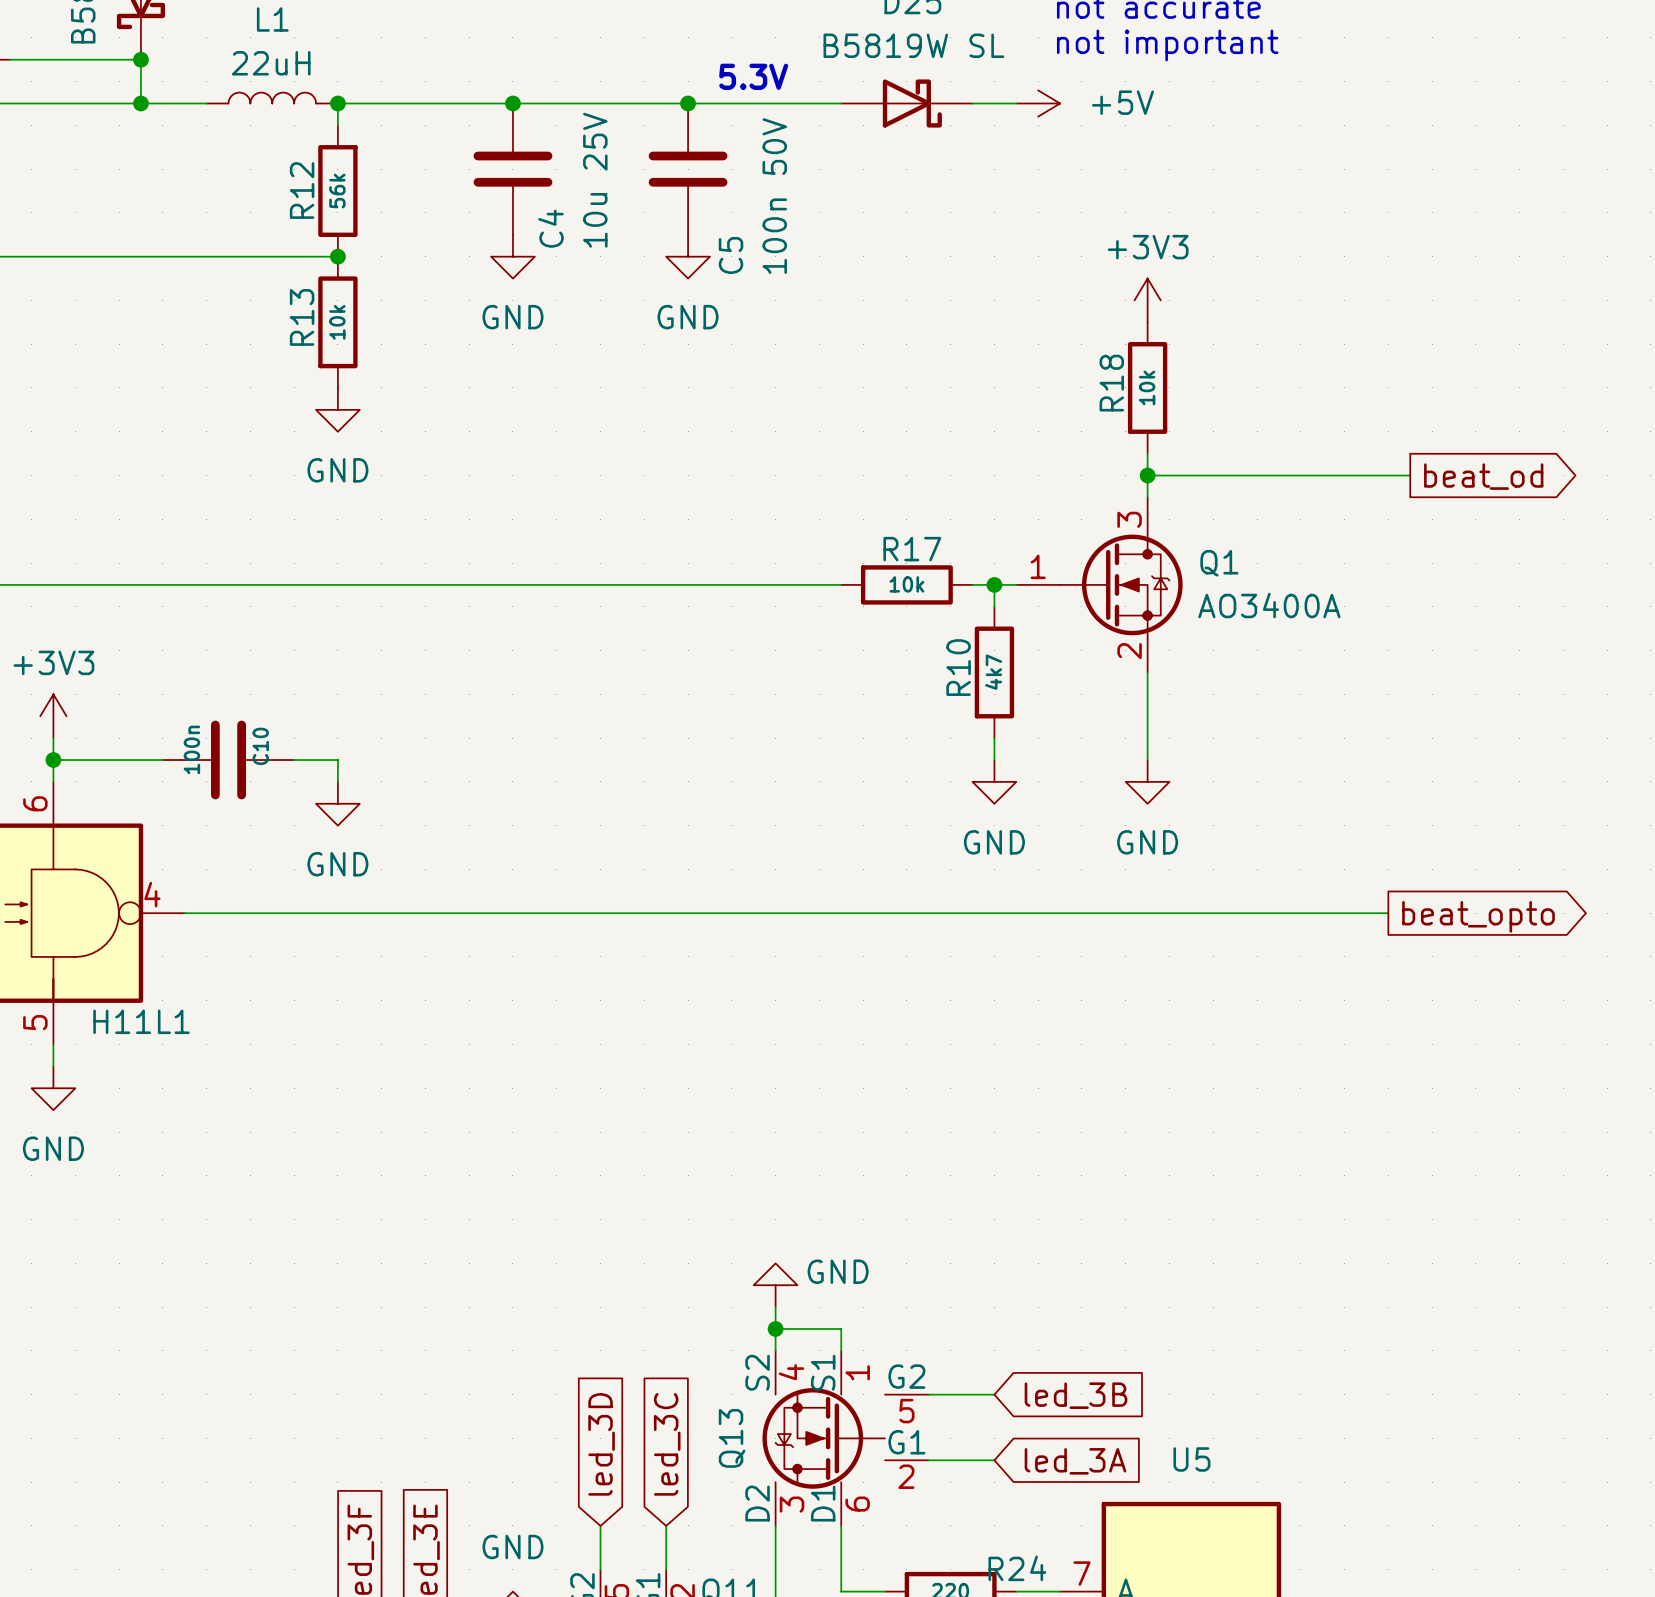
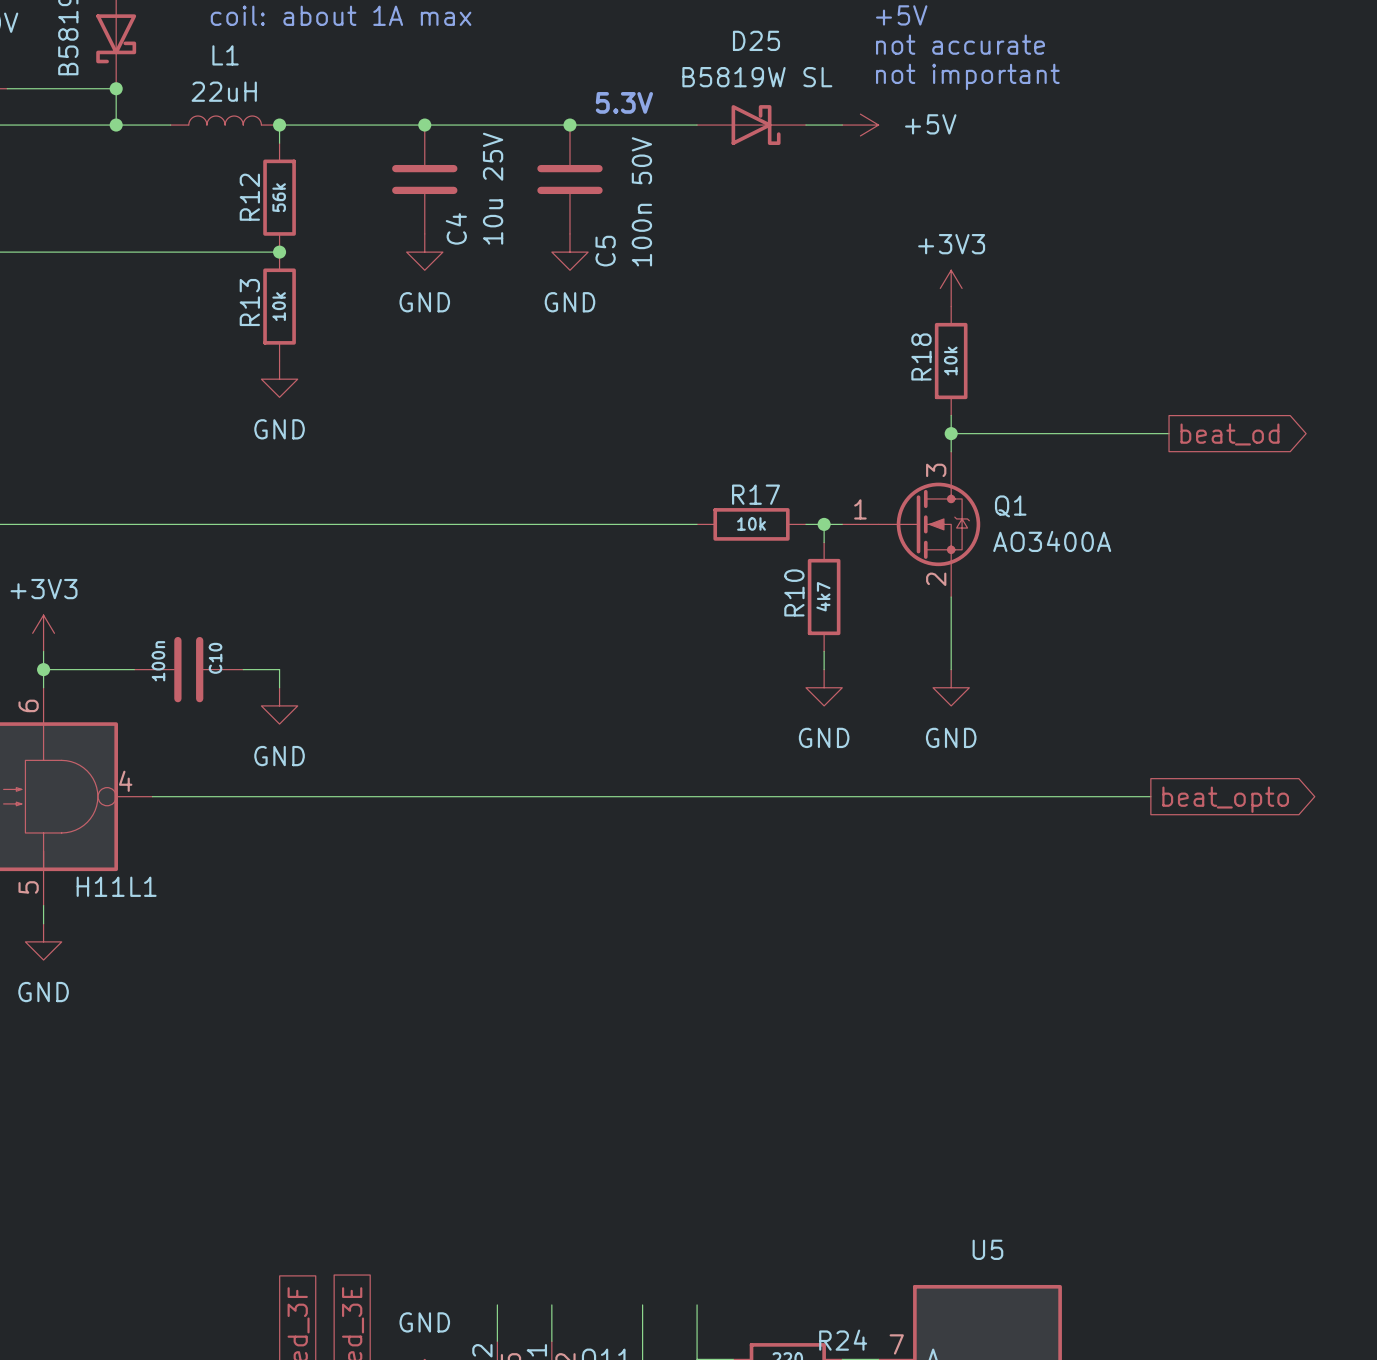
power symbol: GND (775, 1285) -> none
wire: (775, 1307) (775, 1350) -> none
wire: (775, 1328) (841, 1328) (841, 1350) -> none
junction: (775, 1328) -> none
wire: (928, 1394) (994, 1394) -> none
global label: led_3B (1076, 1395) -> none
Q13: (845, 1438) -> none
global label: led_3D (601, 1444) -> none
global label: led_3C (667, 1444) -> none
wire: (928, 1460) (994, 1460) -> none
global label: led_3A (1075, 1461) -> none

